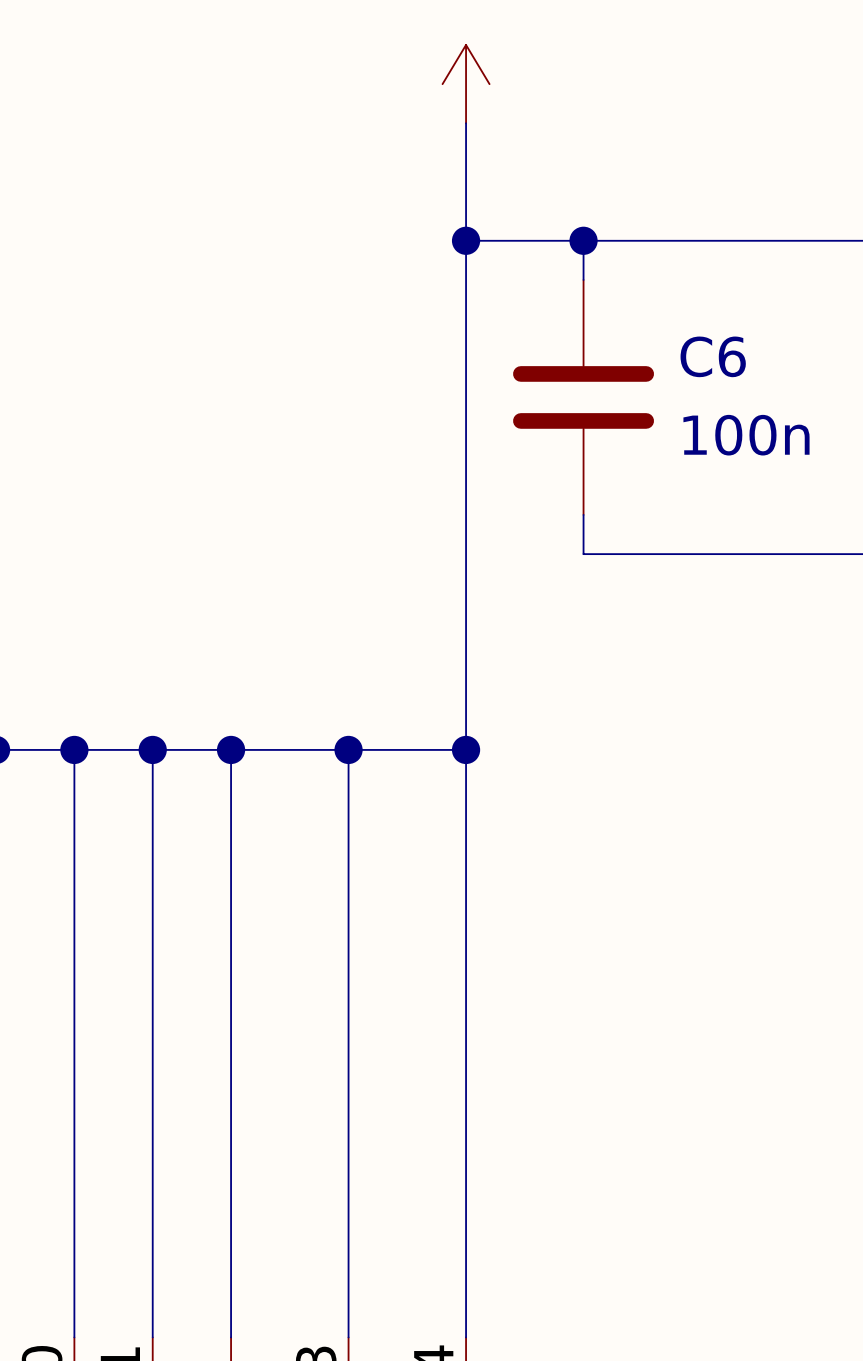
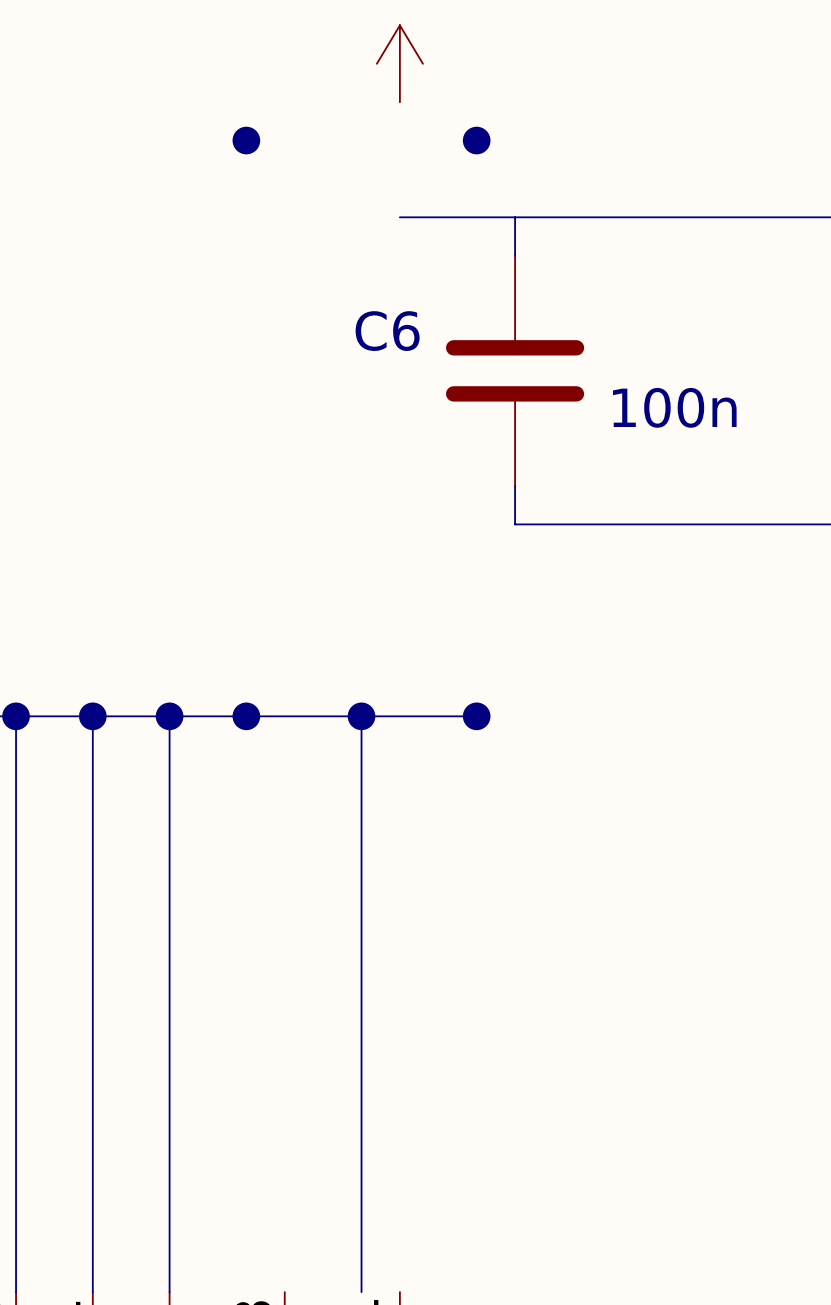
wire: (466, 123) (466, 1337) -> none
junction: none -> (246, 140)
junction: none -> (476, 140)
junction: (466, 240) -> none
junction: (583, 240) -> none
C6 name position: C6 (713, 356) -> C6 (387, 331)
junction: none -> (246, 716)
wire: (348, 749) (348, 1337) -> (361, 716) (361, 1292)
junction: (348, 749) -> none
junction: none -> (361, 716)
wire: none -> (399, 716) (476, 716)
junction: (466, 749) -> none
junction: none -> (476, 716)

